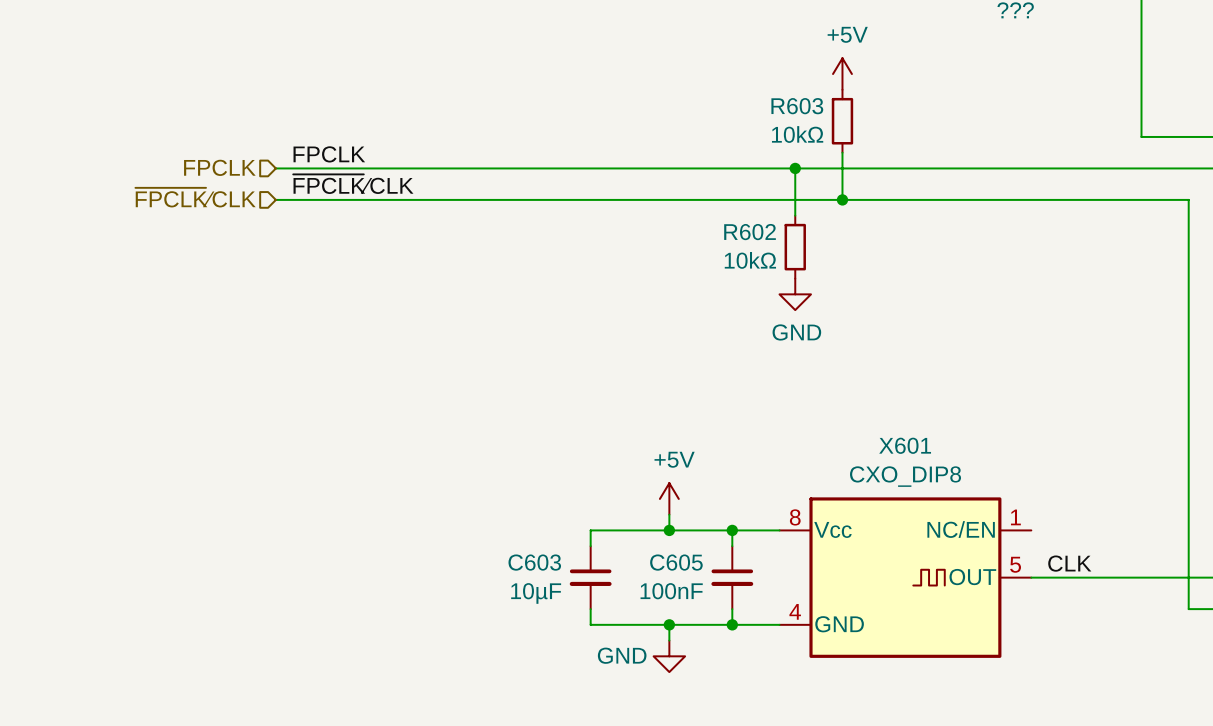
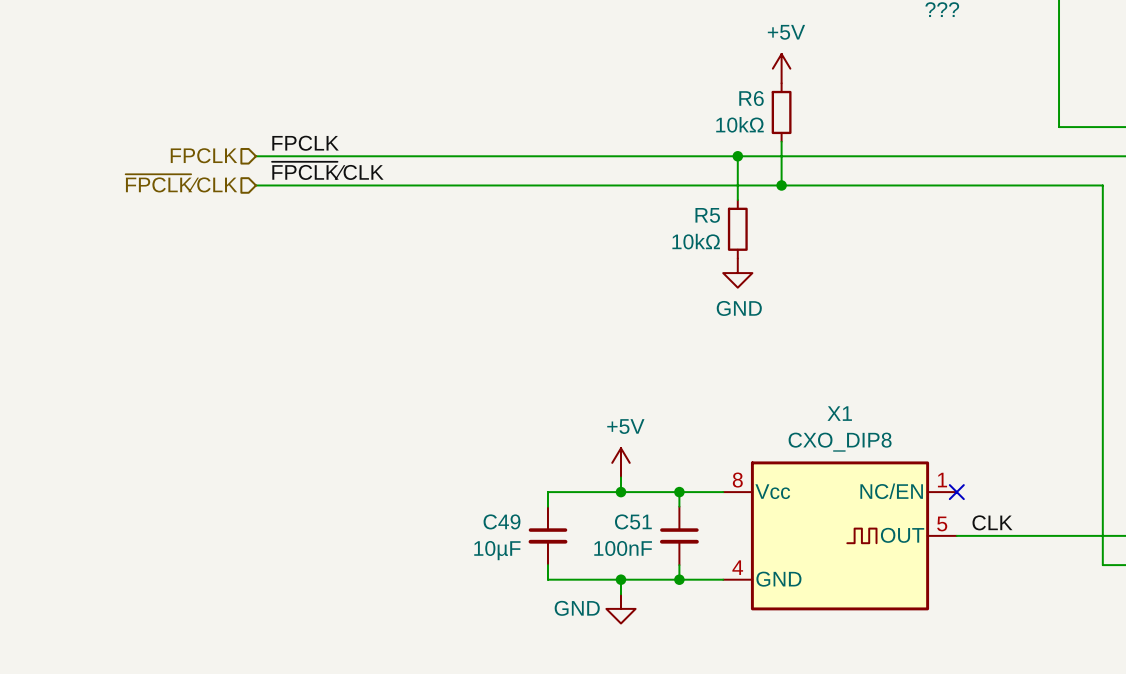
R603 name: R603 (797, 106) -> R6 (751, 98)
R602 name: R602 (750, 232) -> R5 (707, 215)
X601 name: X601 (905, 445) -> X1 (839, 413)
no-connect mark: none -> (956, 492)
C603 name: C603 (534, 562) -> C49 (501, 521)
C605 name: C605 (676, 562) -> C51 (633, 521)

